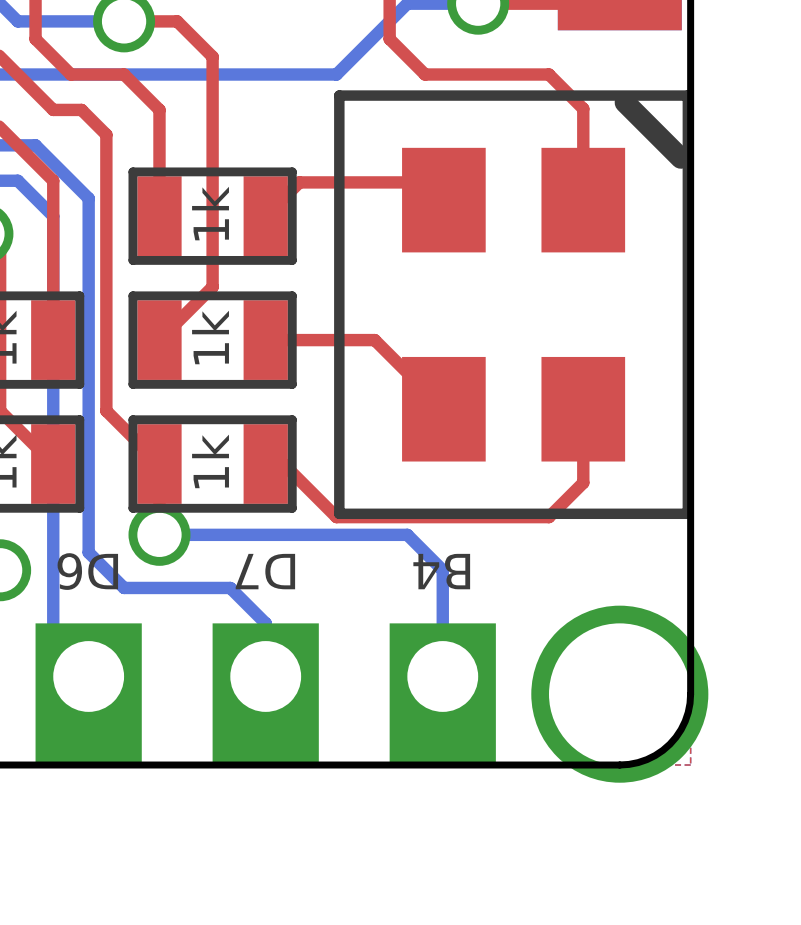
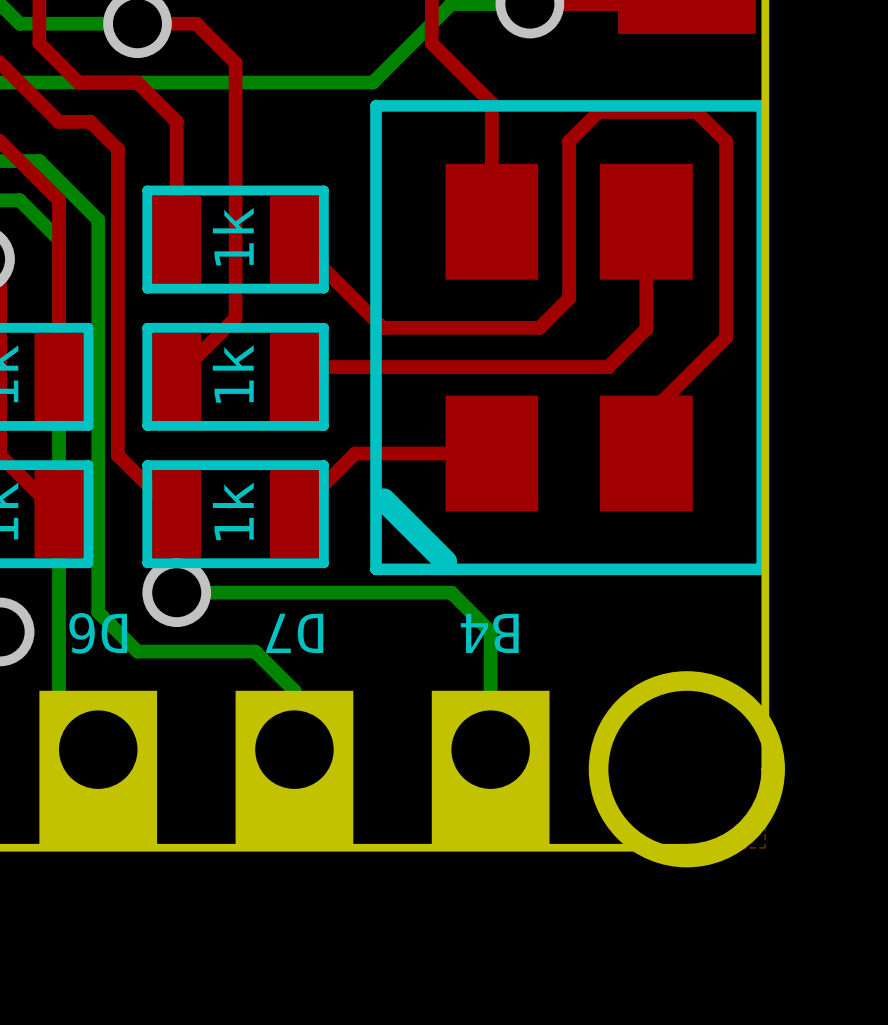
top track: (425, 74) (548, 74) (583, 108) (583, 200) -> (471, 82) (491, 103) (491, 221)
top track: (426, 182) (299, 182) (265, 216) -> none
top track: none -> (646, 221) (646, 329) (608, 367) (304, 367) (294, 376)
part rotation: 0° (513, 304) -> 180° (569, 337)
top track: (265, 340) (374, 340) (443, 409) -> (294, 514) (355, 453) (491, 453)
top track: (583, 409) (583, 482) (548, 517) (336, 517) (283, 464) (265, 464) -> (646, 453) (646, 417) (726, 337) (726, 141) (696, 112) (598, 112) (569, 141) (569, 298) (539, 327) (382, 327) (294, 239)

